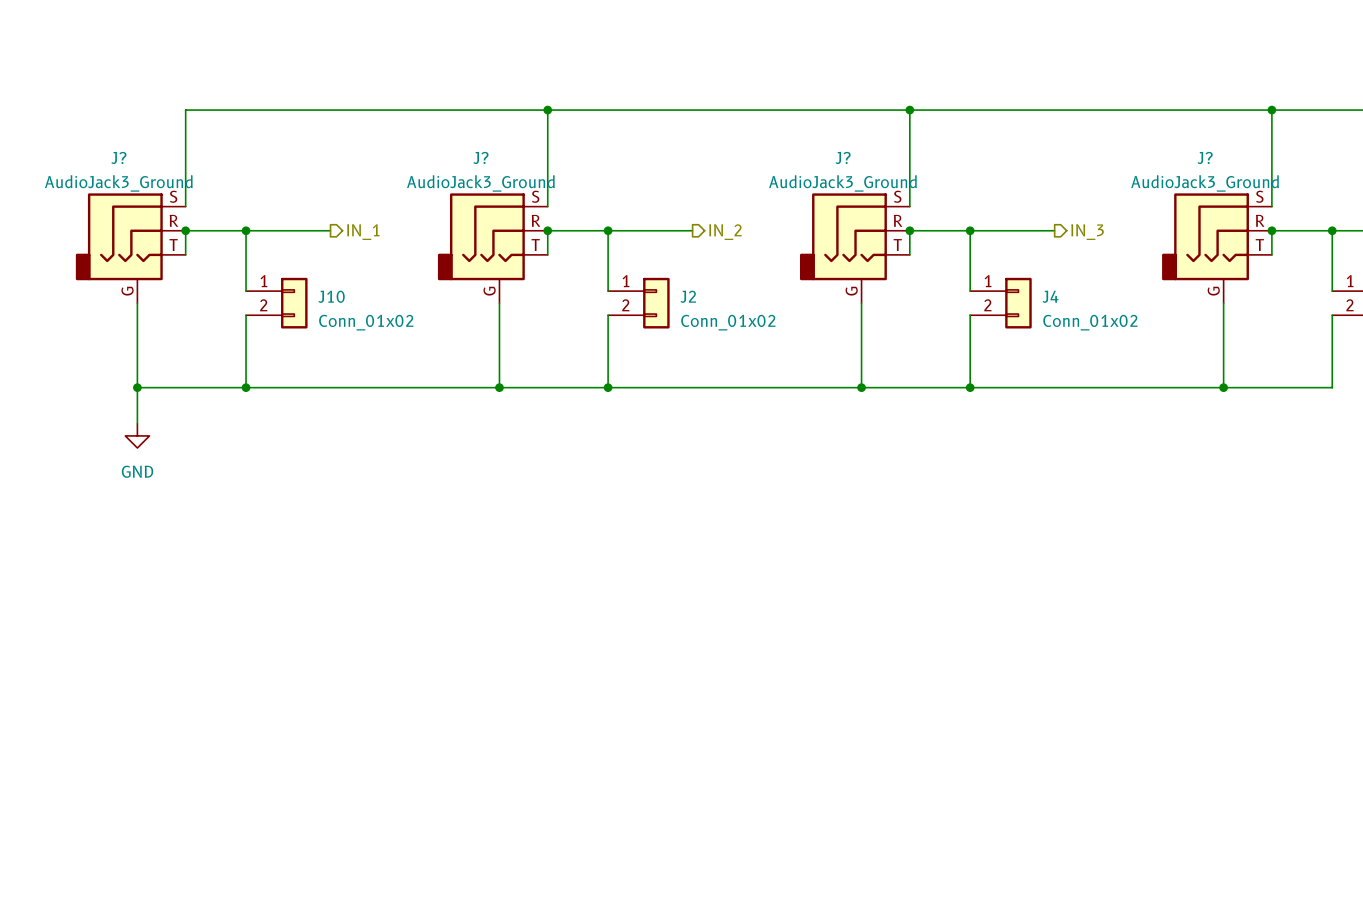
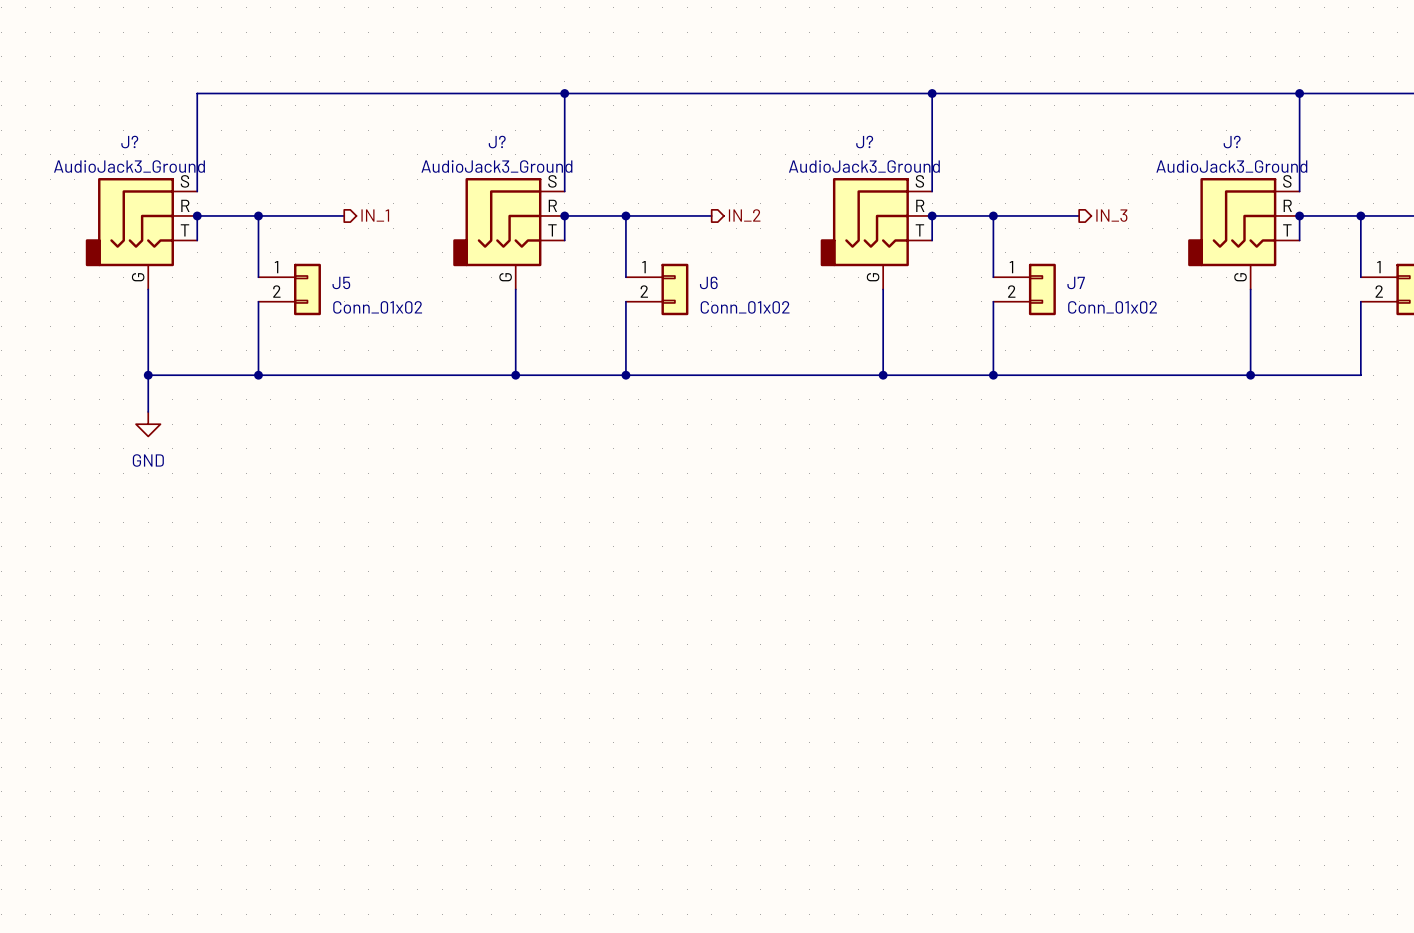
J10 name: J10 (331, 296) -> J5 (341, 282)
J2 name: J2 (688, 296) -> J6 (708, 282)
J4 name: J4 (1050, 296) -> J7 (1076, 282)

